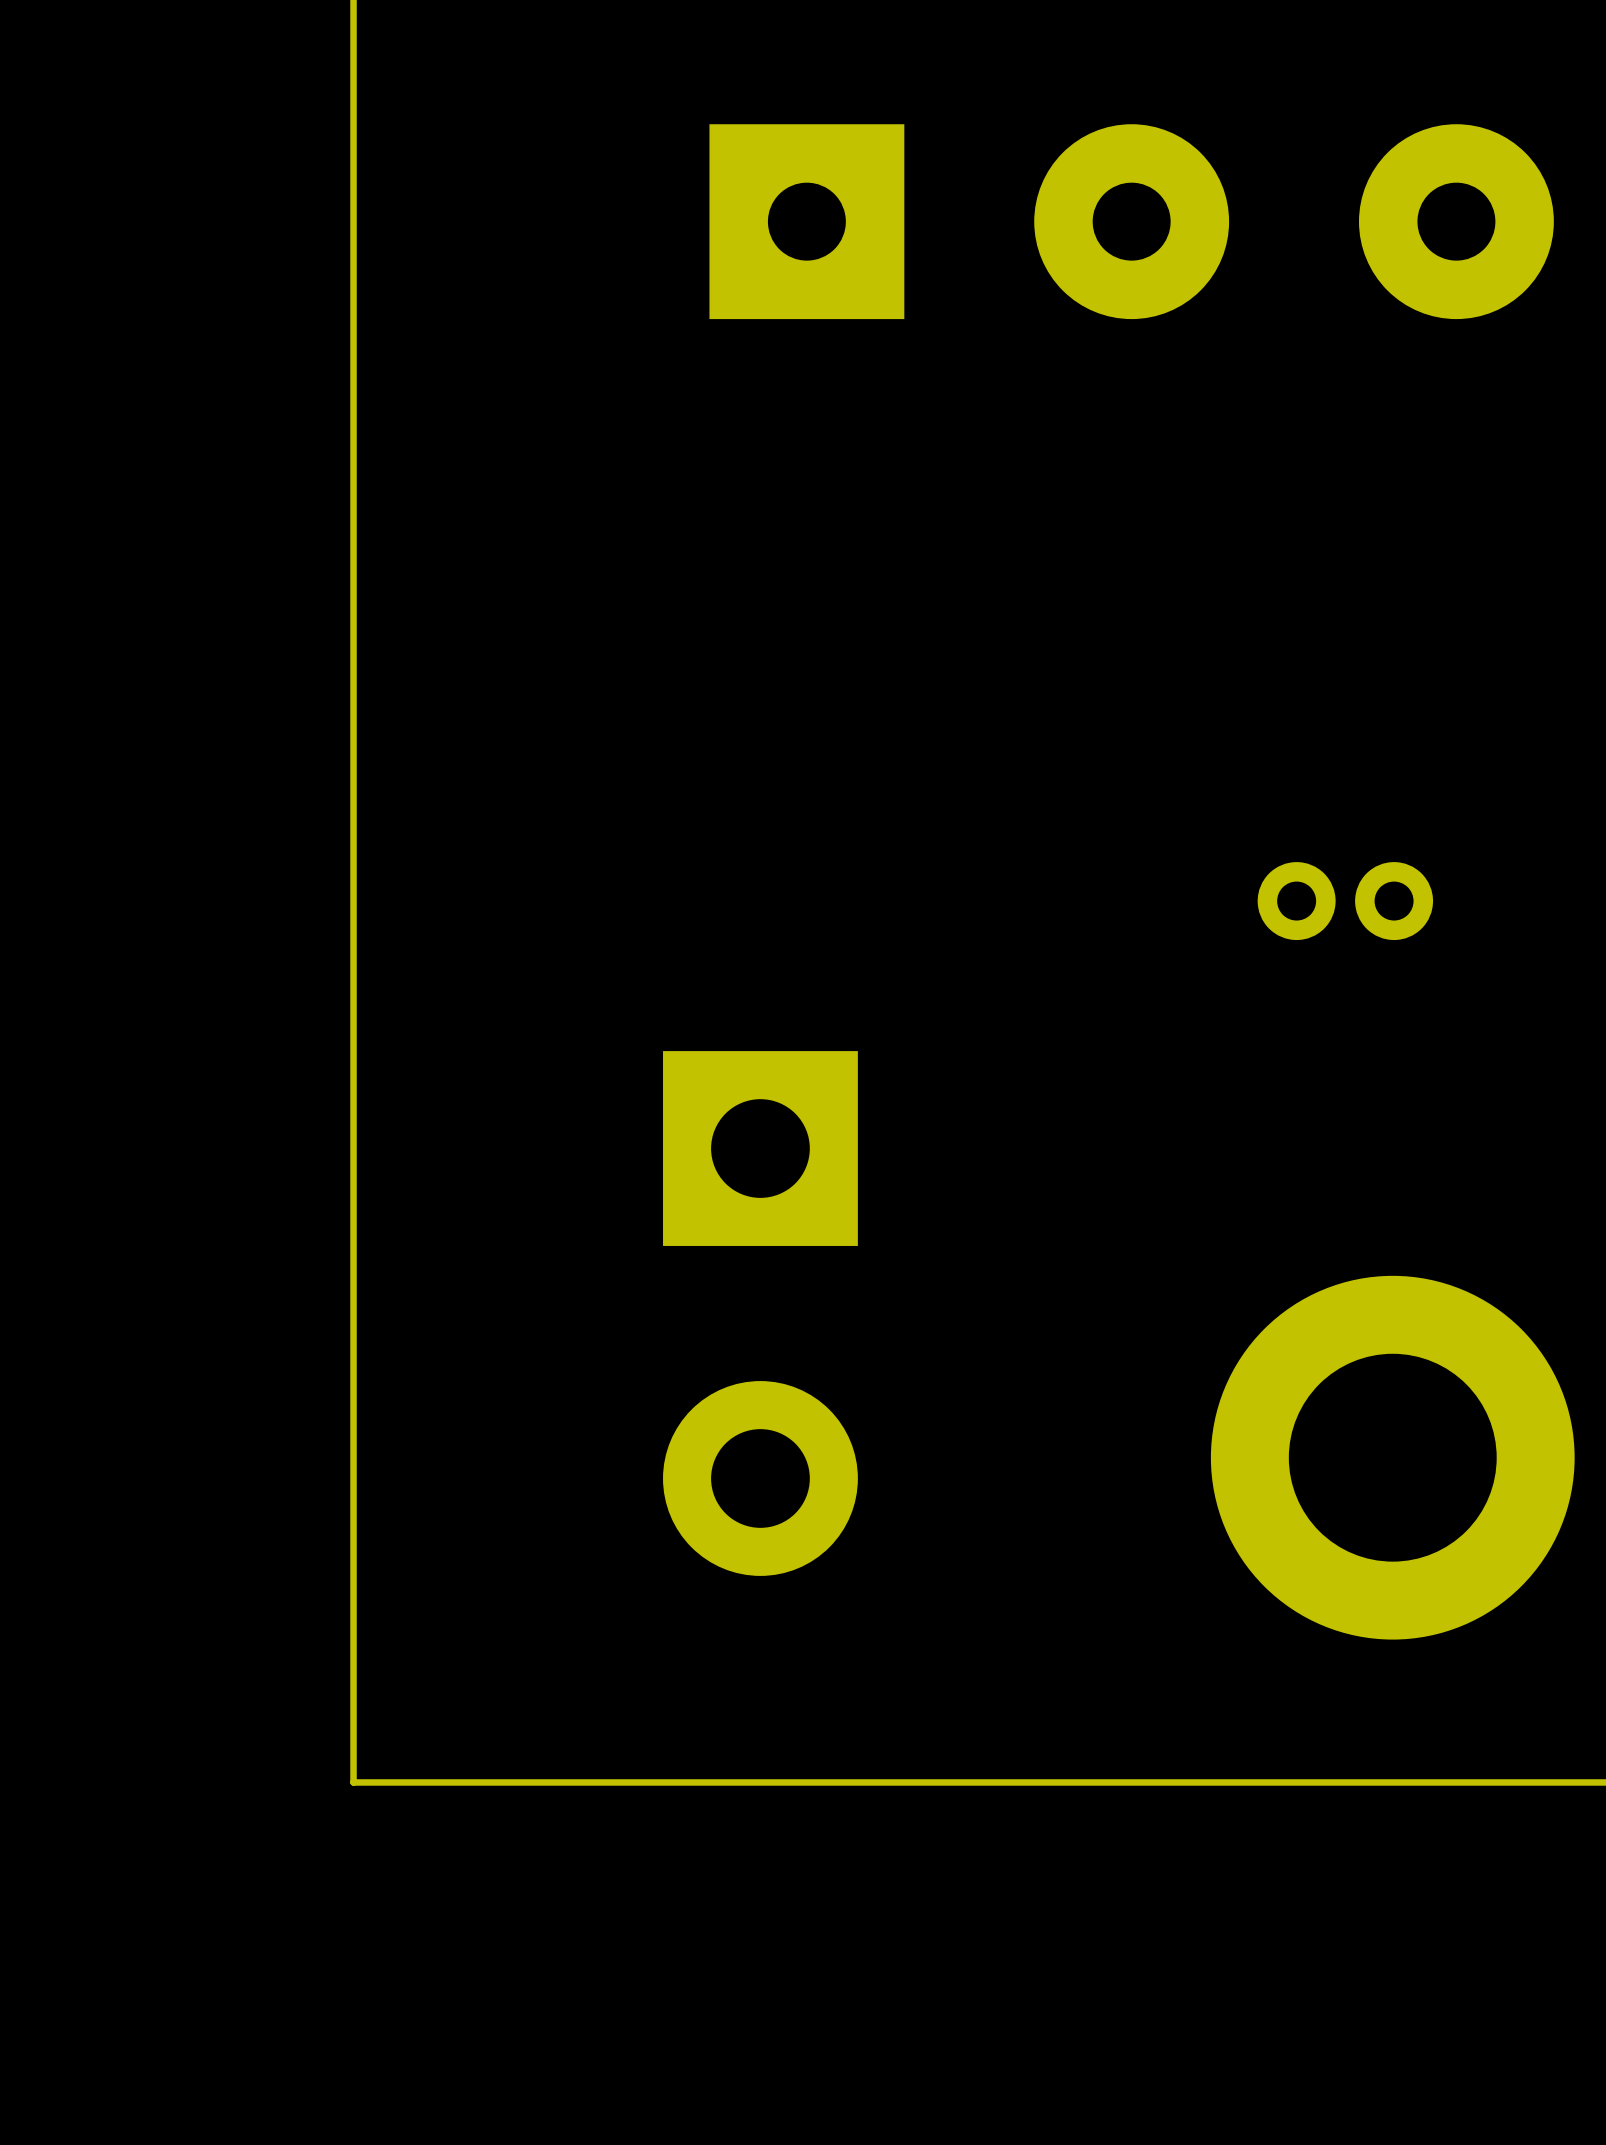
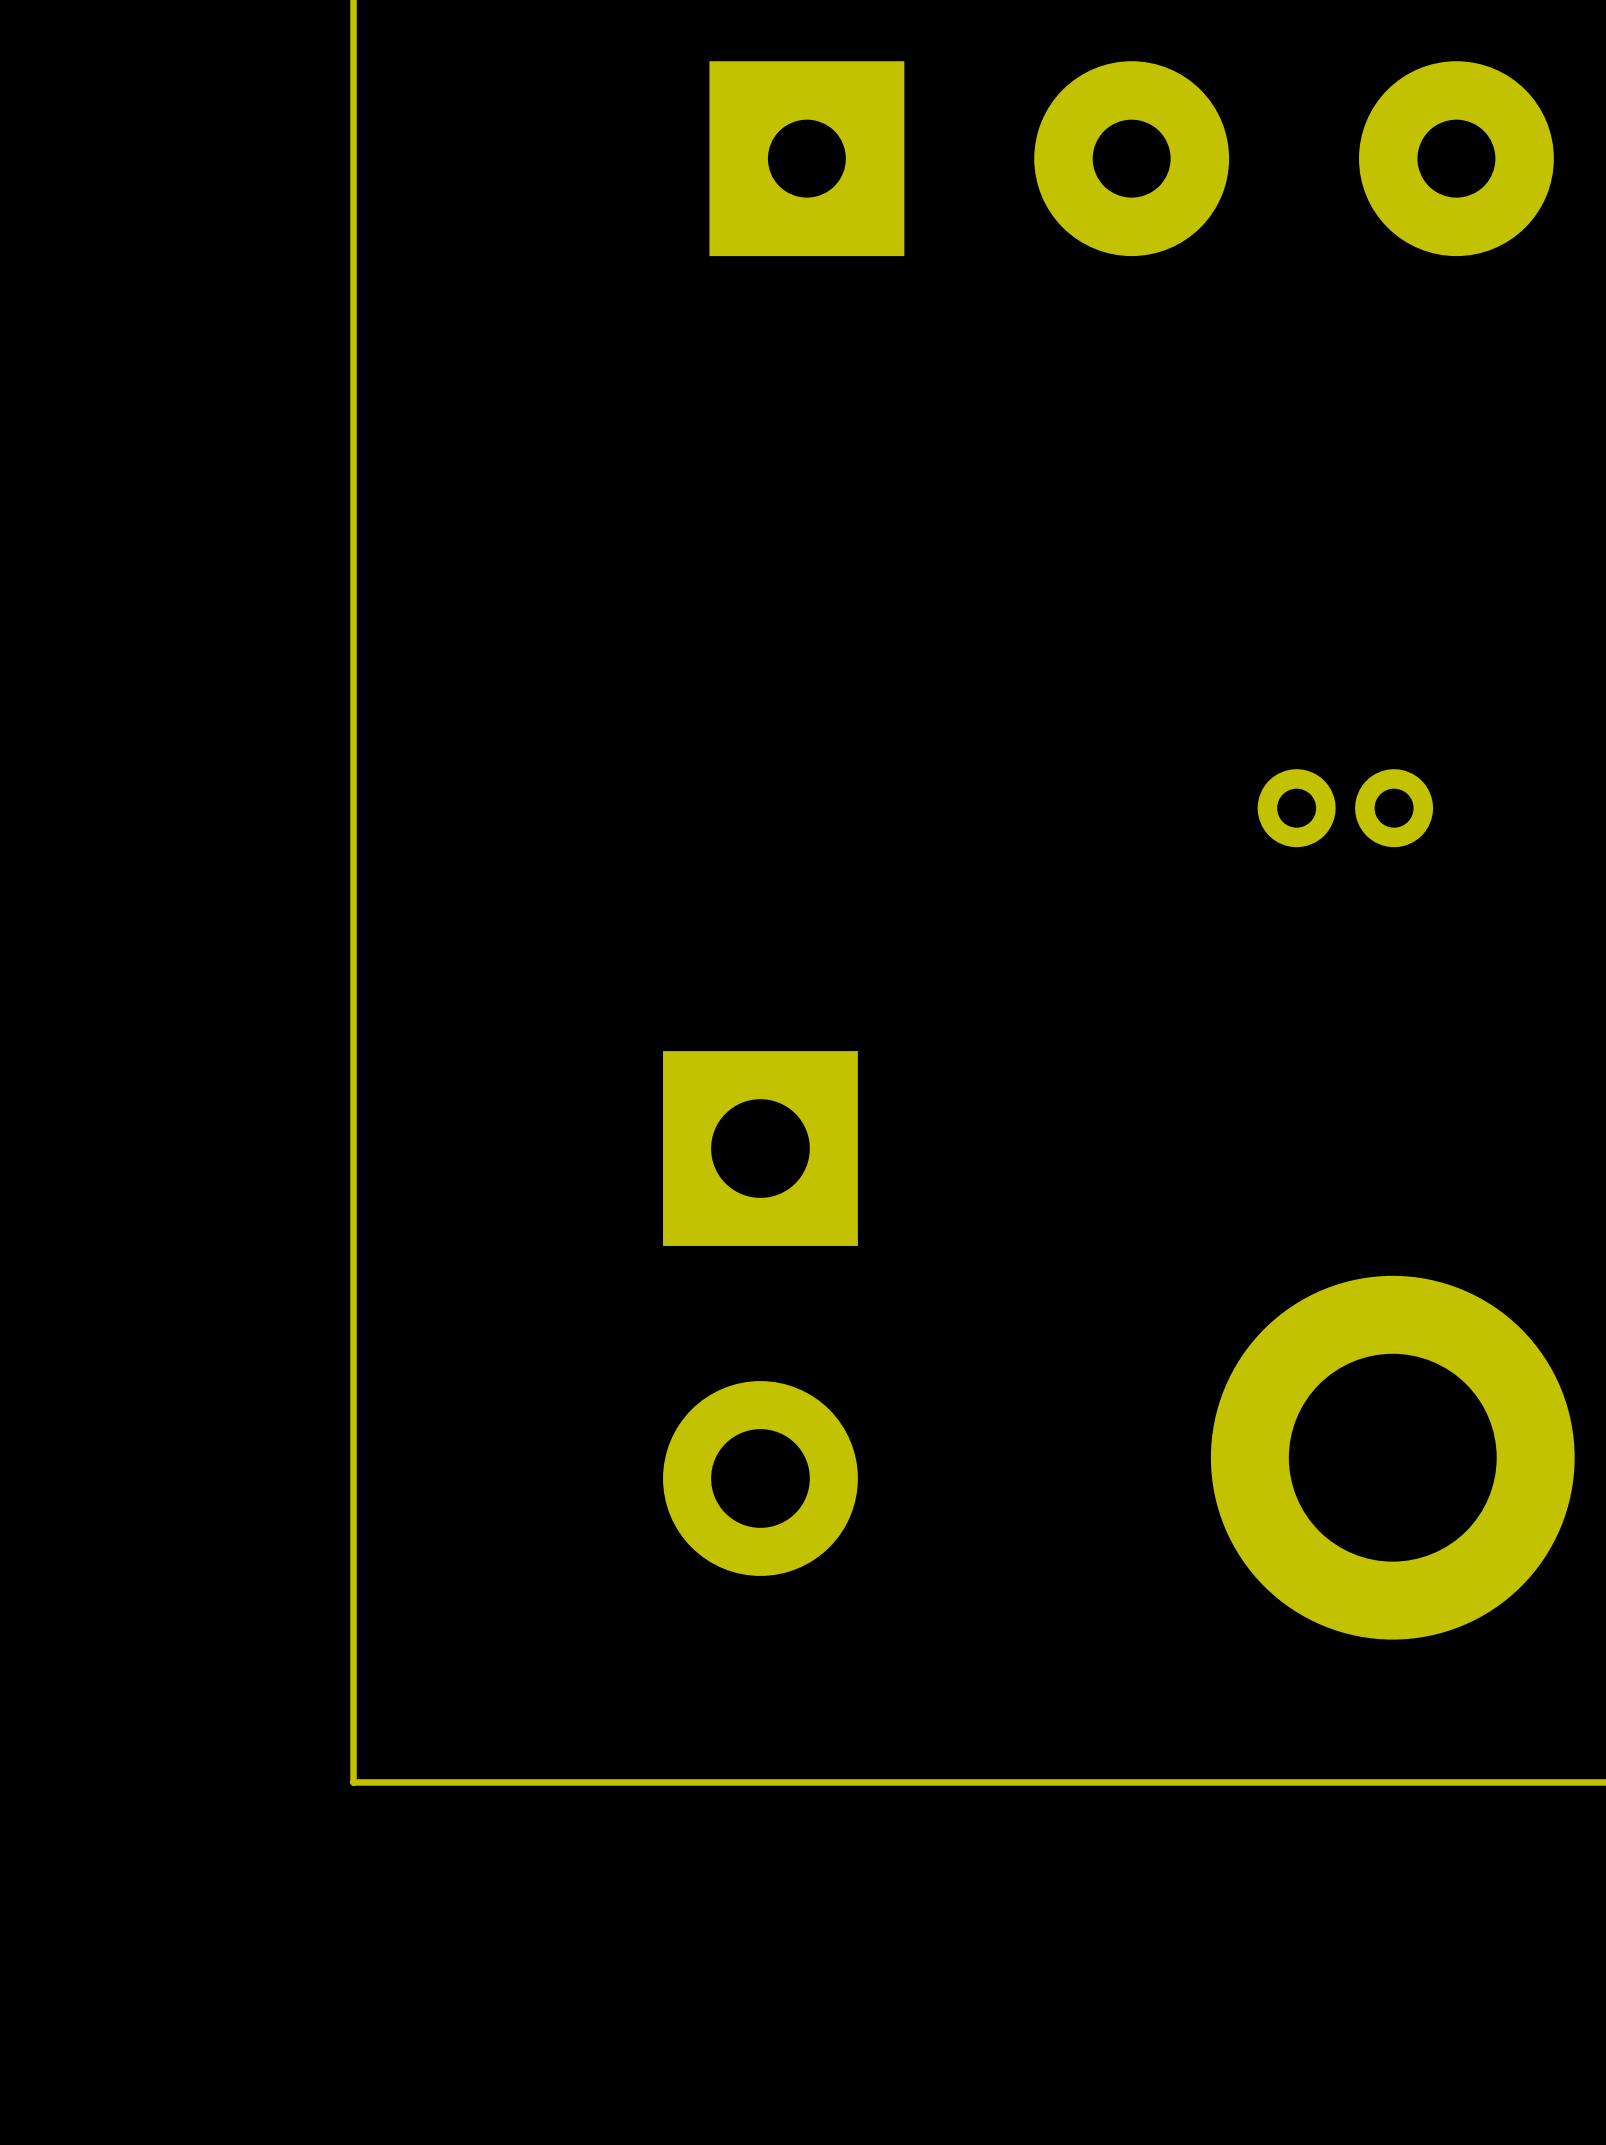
part position: (1131, 221) -> (1131, 158)
part position: (1345, 901) -> (1345, 808)

